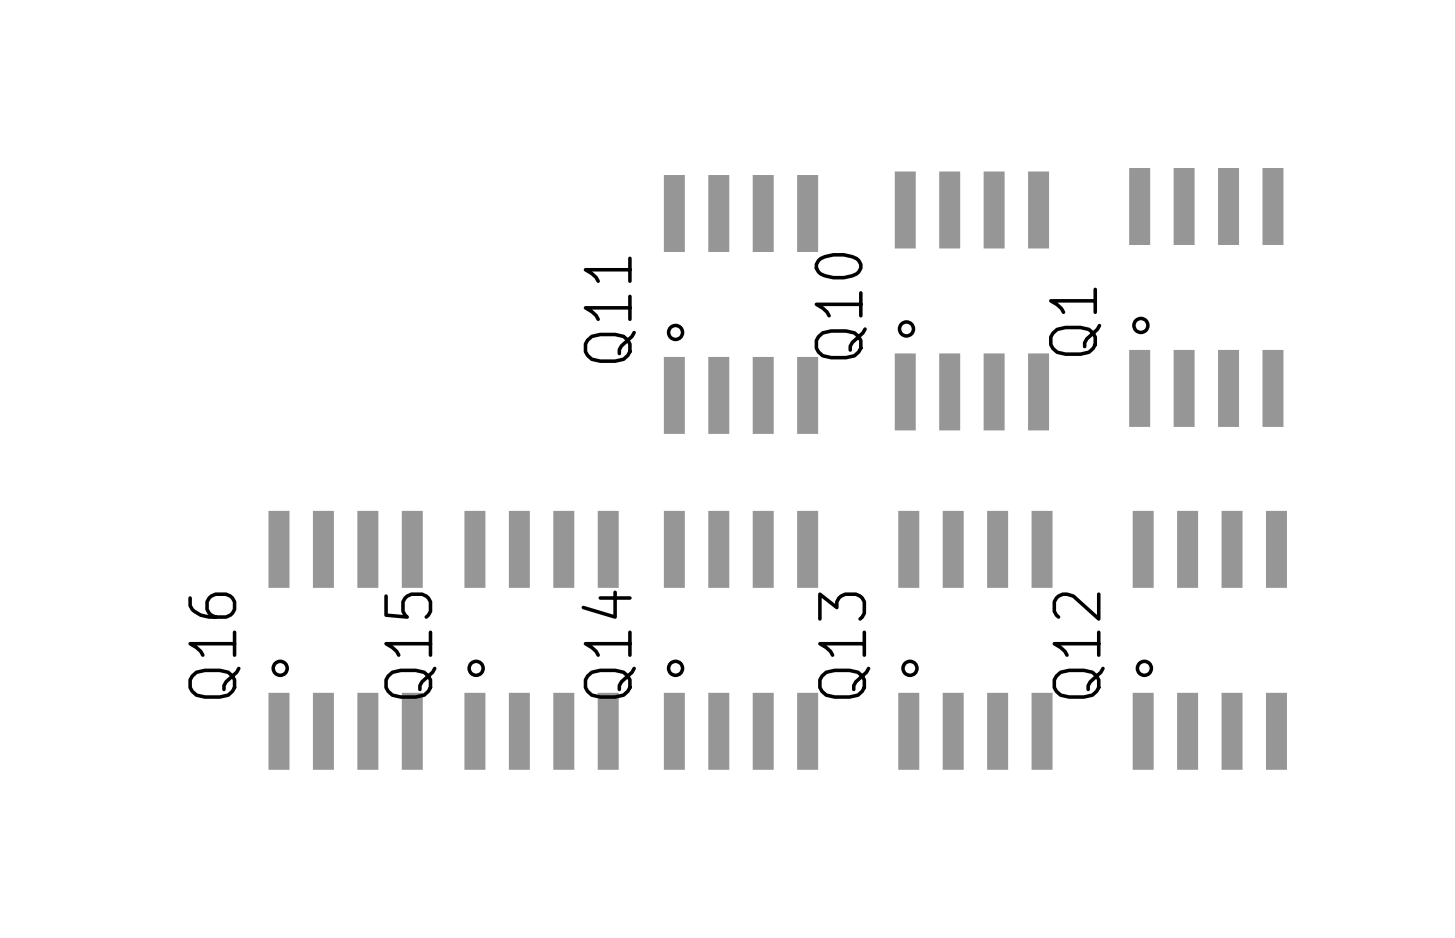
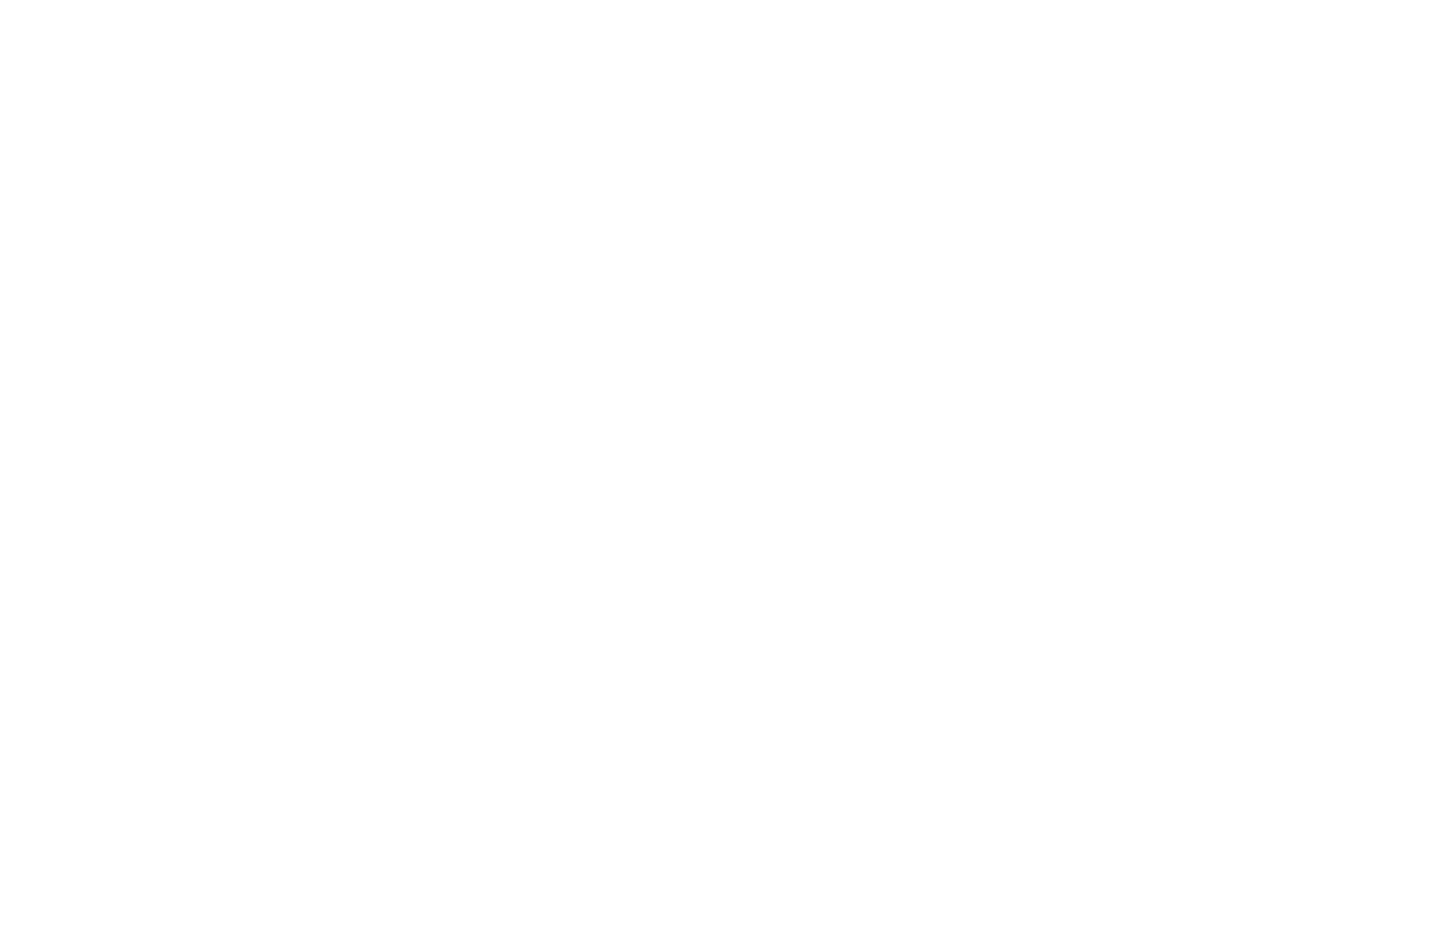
Q1: (1206, 297) -> none
Q10: (971, 300) -> none
Q11: (740, 304) -> none
Q16: (345, 640) -> none
Q15: (541, 640) -> none
Q14: (740, 640) -> none
Q13: (975, 640) -> none
Q12: (1209, 640) -> none

